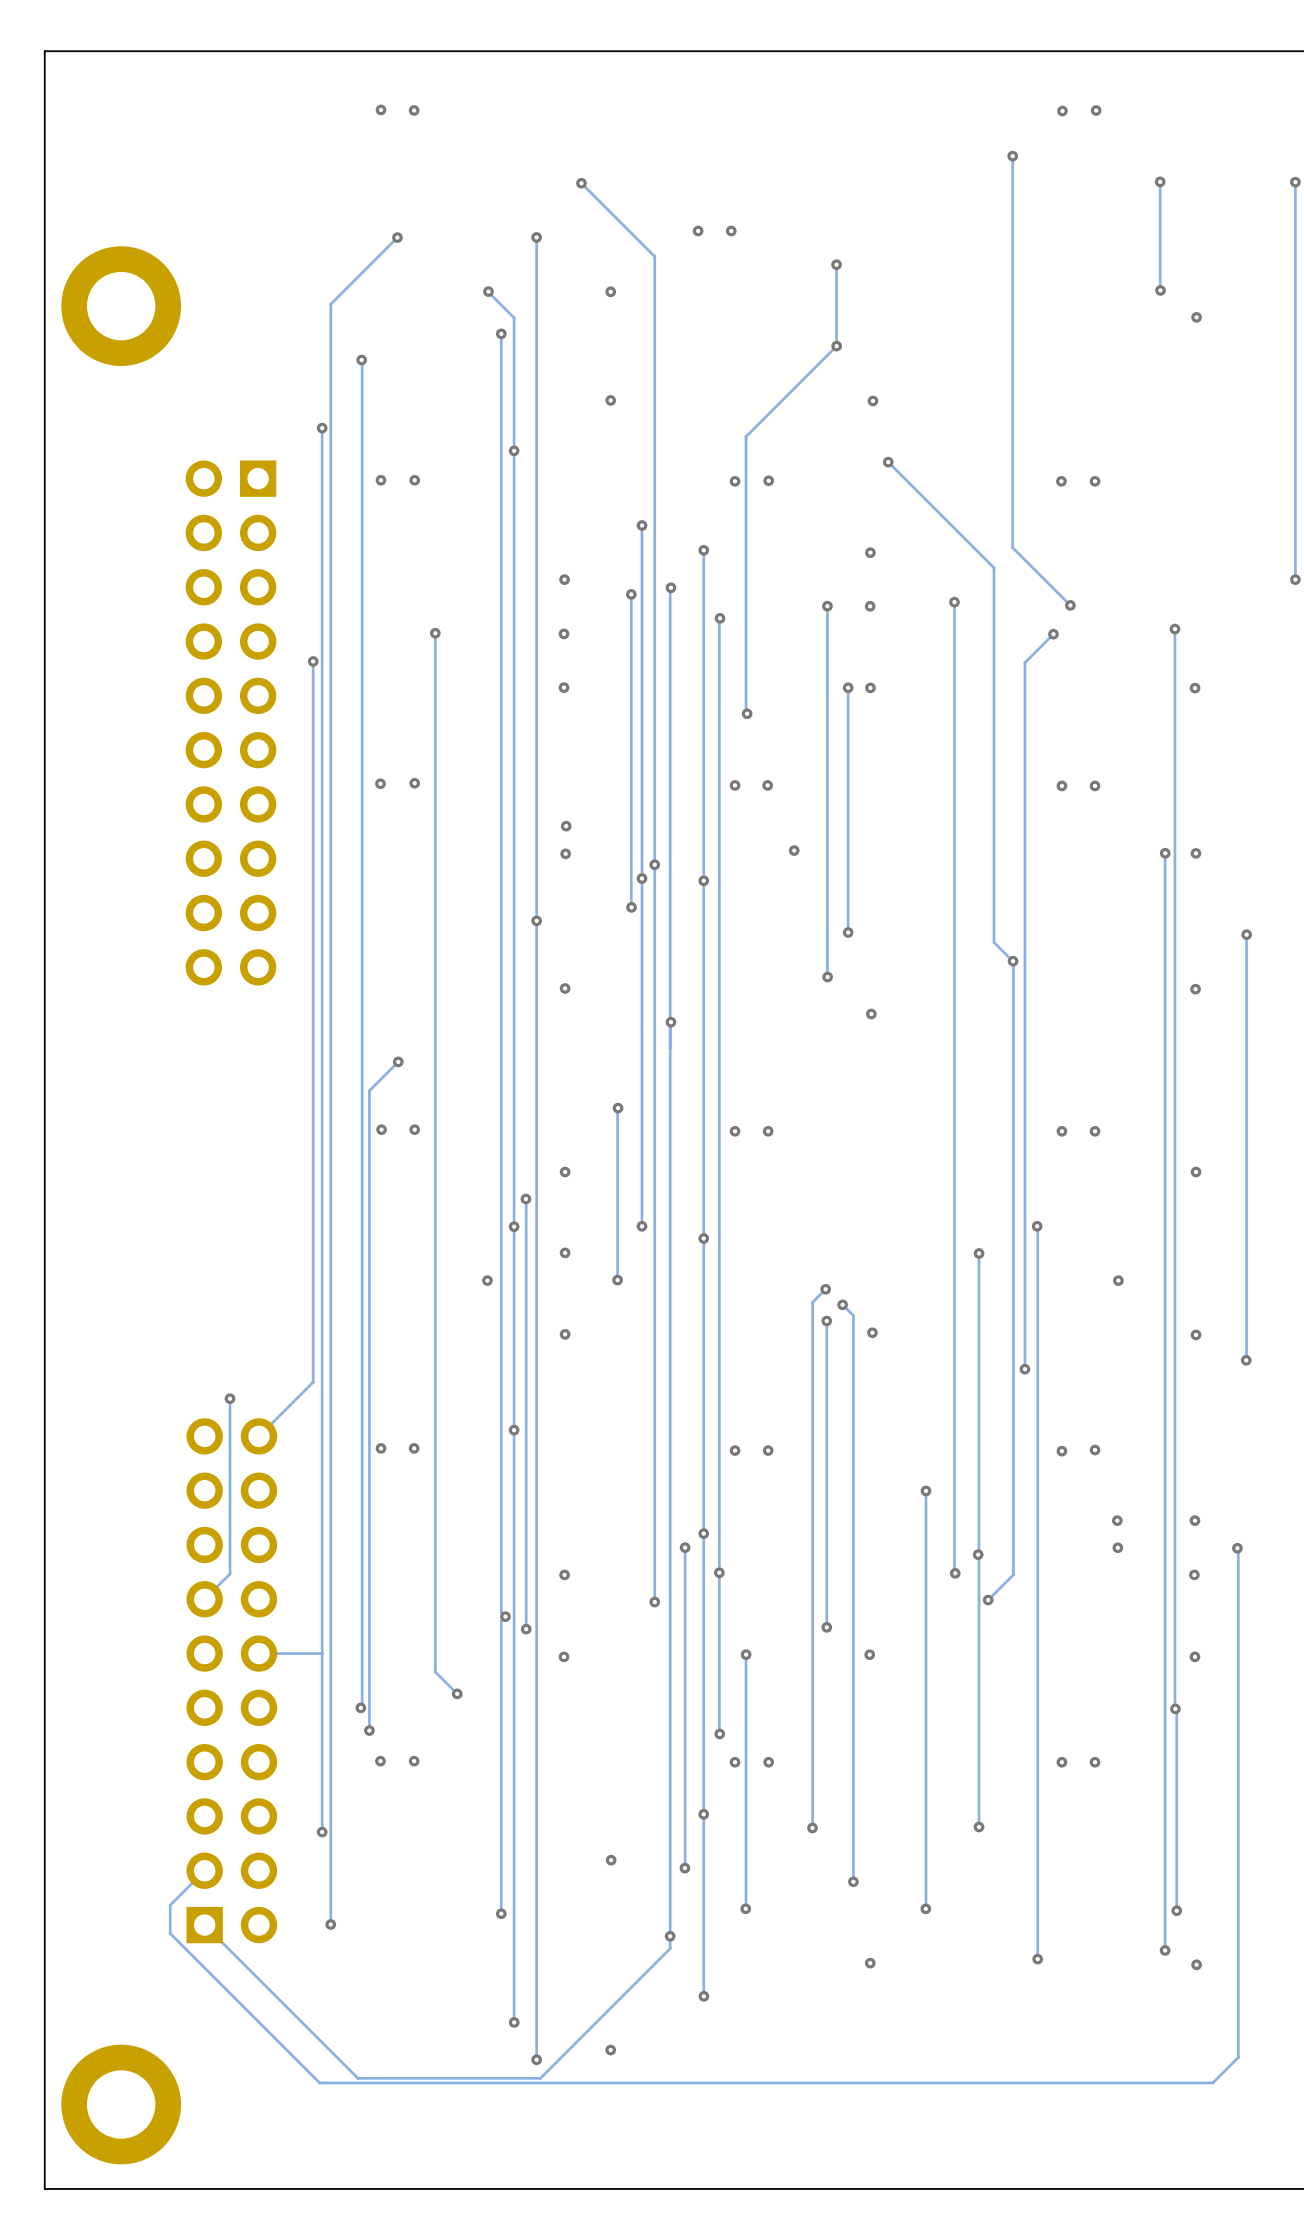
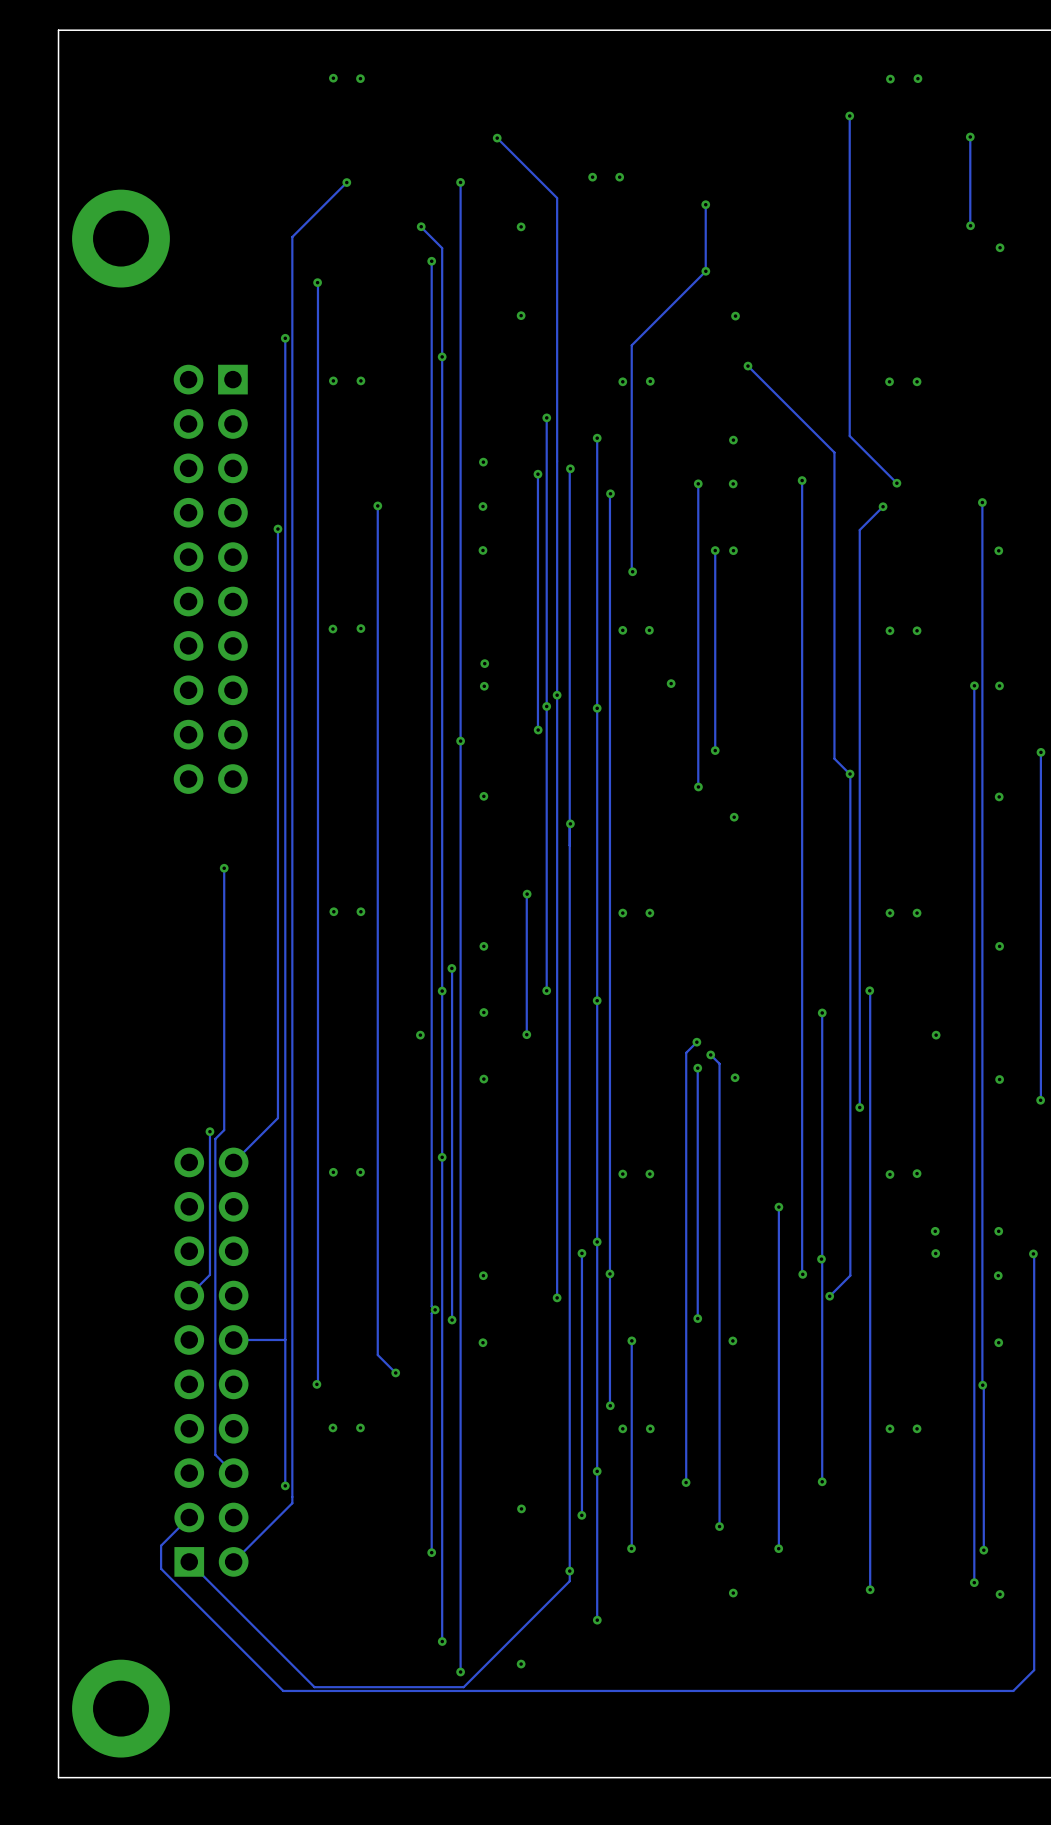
track: (398, 1061) (369, 1090) (369, 1730) -> none
via: (398, 1061) -> none
track: none -> (224, 868) (224, 1130) (215, 1138) (215, 1454) (233, 1473)
via: none -> (224, 868)
via: (369, 1730) -> none
track: (330, 1853) (330, 1924) -> (292, 1503) (233, 1561)
via: (330, 1924) -> none

